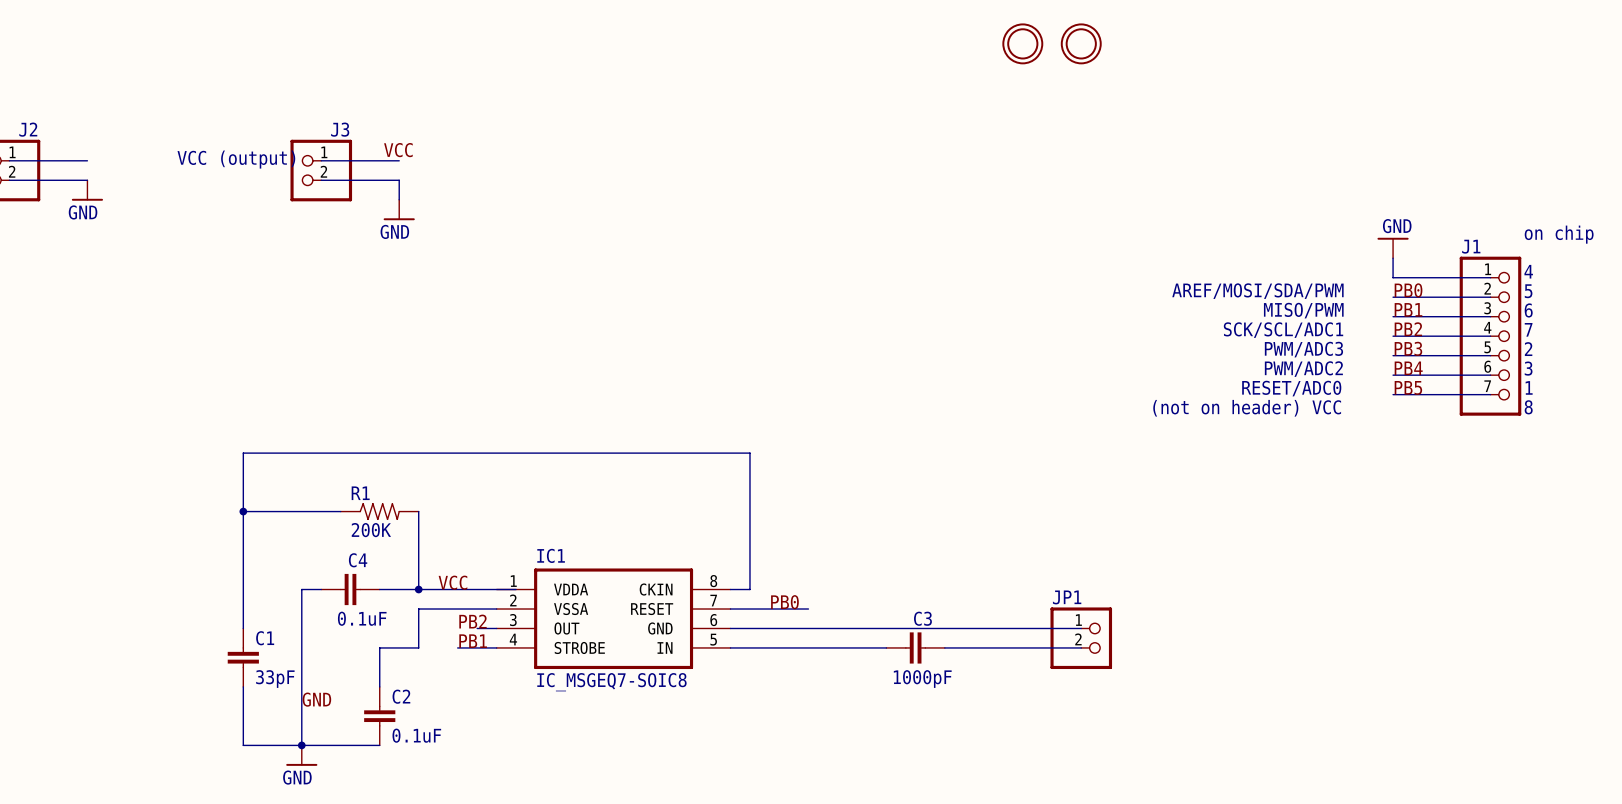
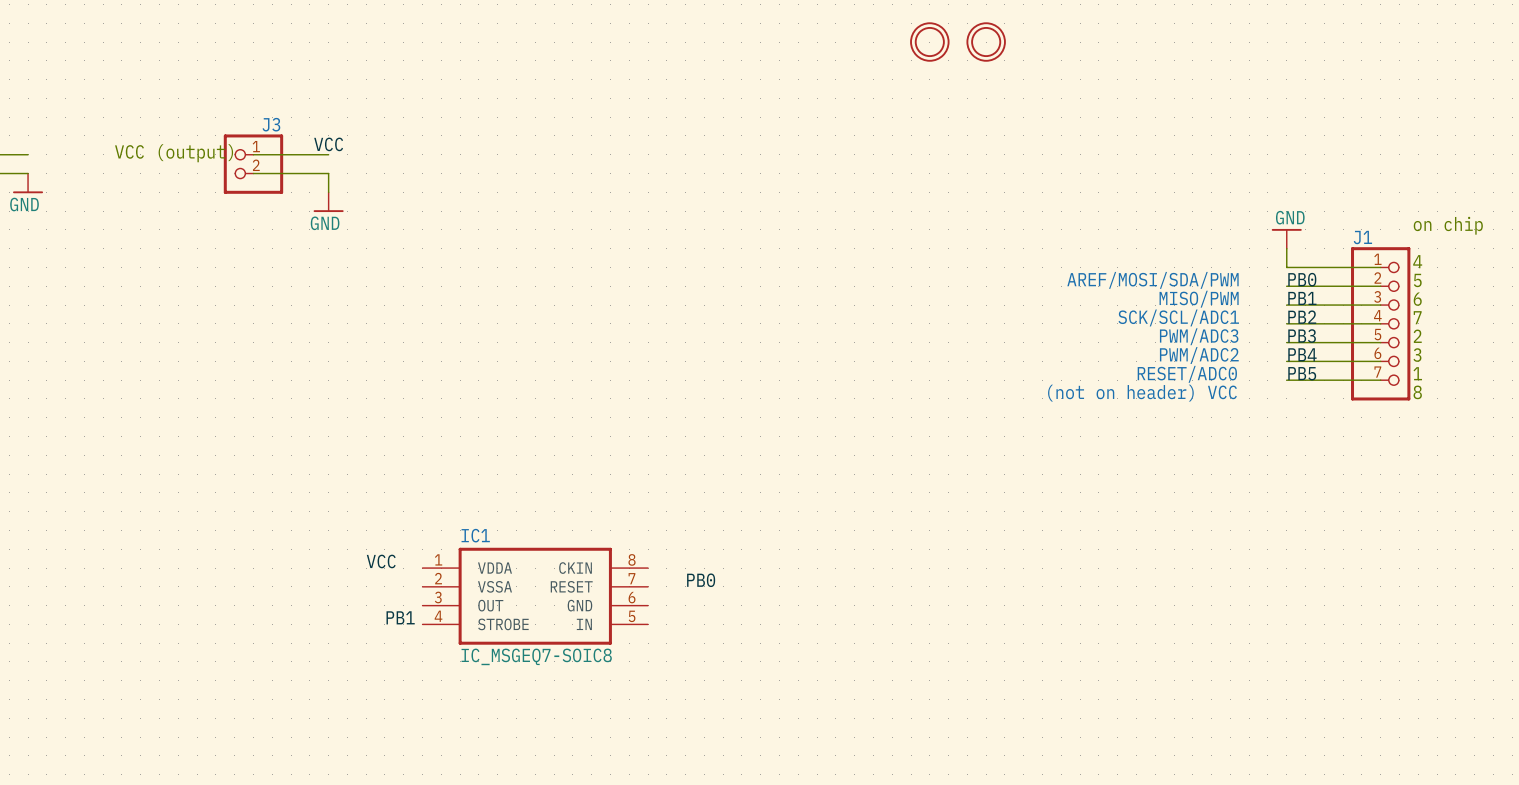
wire: (243, 511) (340, 511) -> none
junction: (243, 511) -> none
R1: 200K (379, 511) -> none
wire: (418, 511) (418, 589) -> none
wire: (321, 589) (301, 589) (301, 745) -> none
C4: 0.1uF (350, 589) -> none
wire: (379, 589) (516, 589) -> none
junction: (418, 589) -> none
wire: (730, 589) (749, 589) (749, 453) (243, 453) (243, 628) -> none
wire: (496, 609) (418, 609) (418, 647) (379, 647) (379, 686) -> none
wire: (730, 609) (808, 609) -> none
label: PB2 (472, 621) -> none
wire: (477, 628) (496, 628) -> none
wire: (730, 628) (1081, 628) -> none
JP1: (1081, 638) -> none
wire: (457, 647) (496, 647) -> none
wire: (730, 647) (886, 647) -> none
C3: 1000pF (915, 647) -> none
wire: (944, 647) (1081, 647) -> none
C1: 33pF (243, 657) -> none
wire: (243, 686) (243, 745) (379, 745) -> none
label: GND (316, 699) -> none
C2: 0.1uF (379, 716) -> none
junction: (301, 745) -> none
power symbol: GND (301, 755) -> none

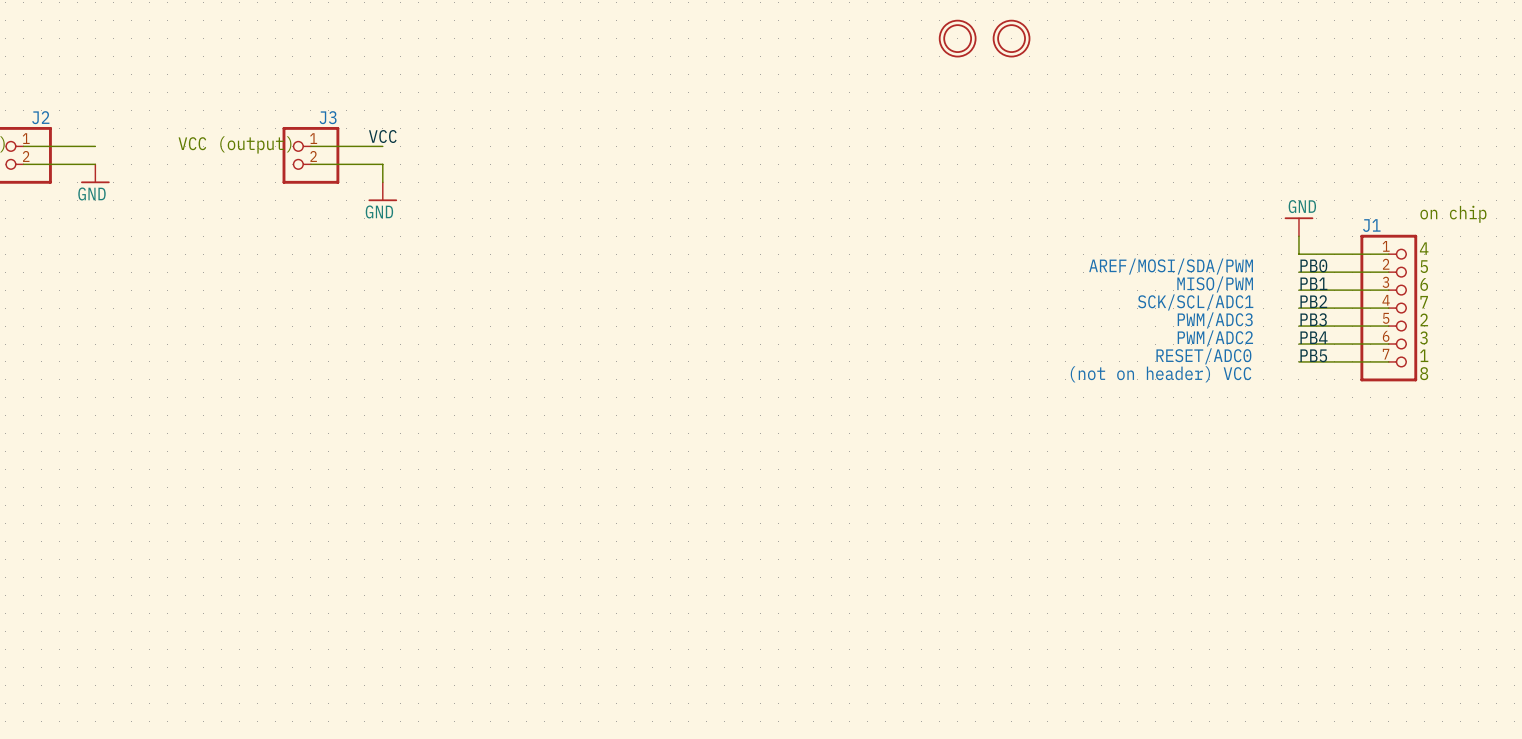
label: VCC (381, 561) -> none
label: PB0 (701, 580) -> none
IC1: IC_MSGEQ7-SOIC8 (535, 596) -> none
label: PB1 (400, 617) -> none

